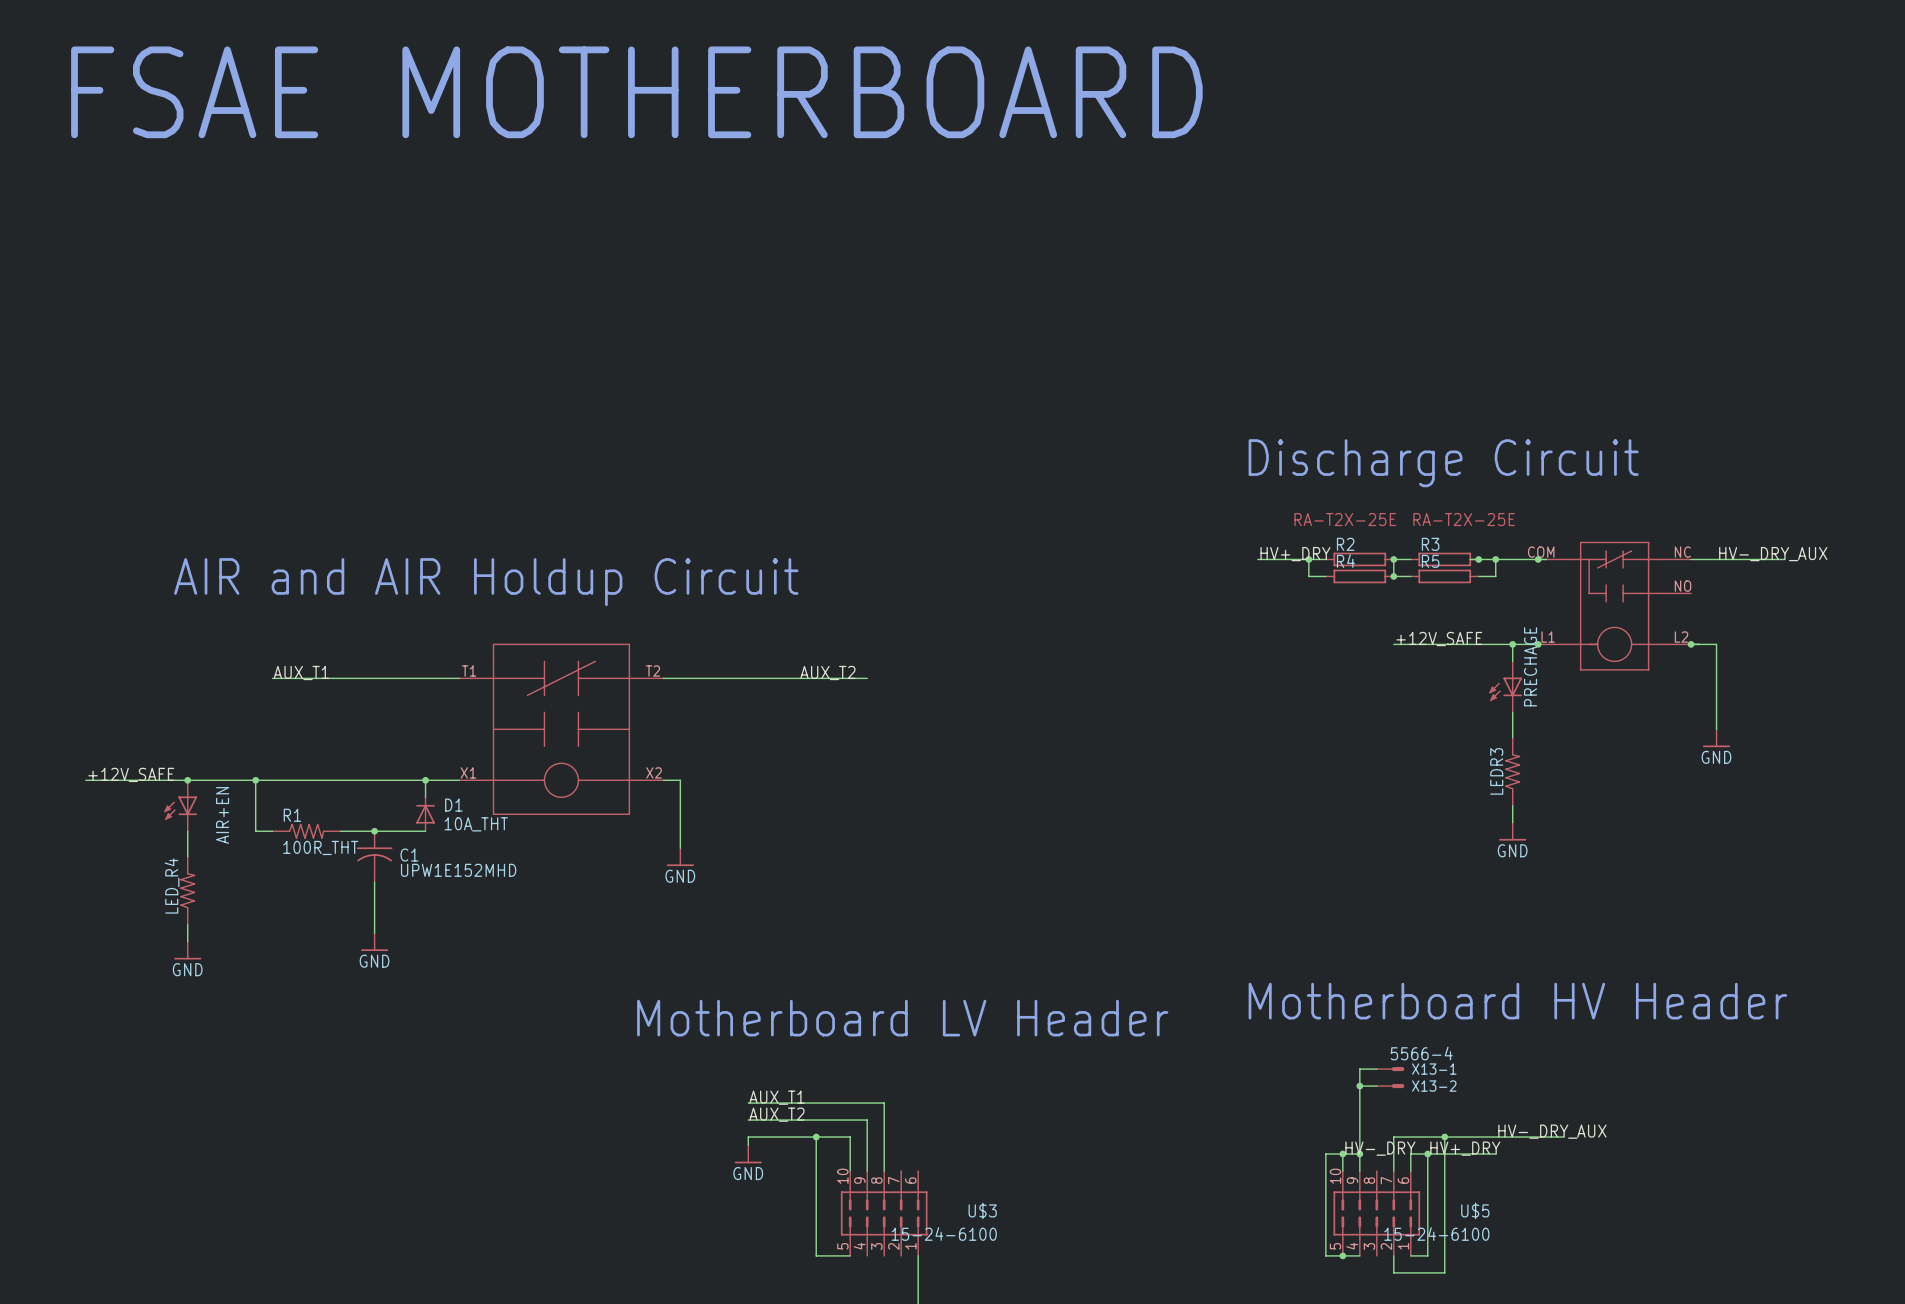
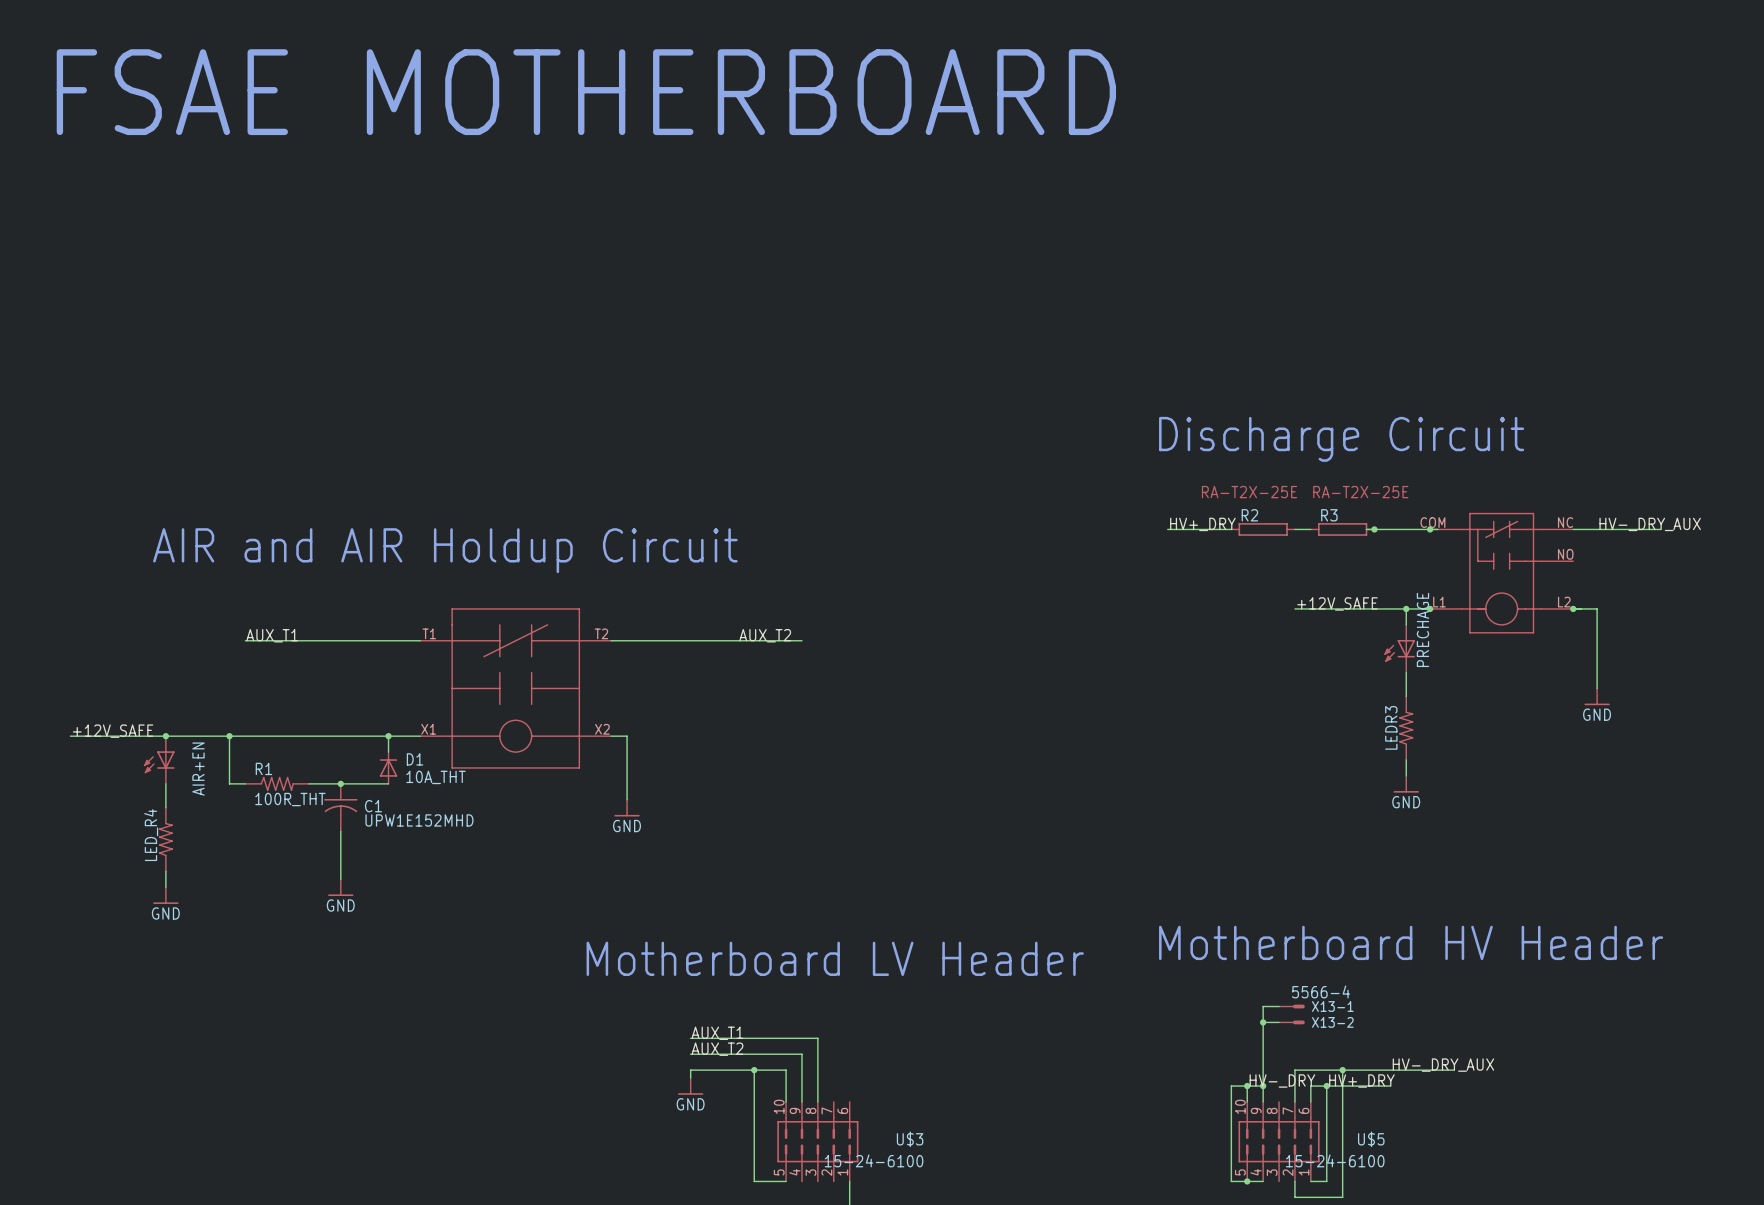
wire: (1308, 559) (1308, 576) (1325, 576) -> none
junction: (1308, 559) -> none
wire: (1393, 559) (1393, 576) (1410, 576) -> none
junction: (1393, 559) -> none
wire: (1495, 559) (1495, 576) (1478, 576) -> none
junction: (1495, 559) -> none
R4: (1359, 576) -> none
junction: (1393, 576) -> none
R5: (1444, 576) -> none

